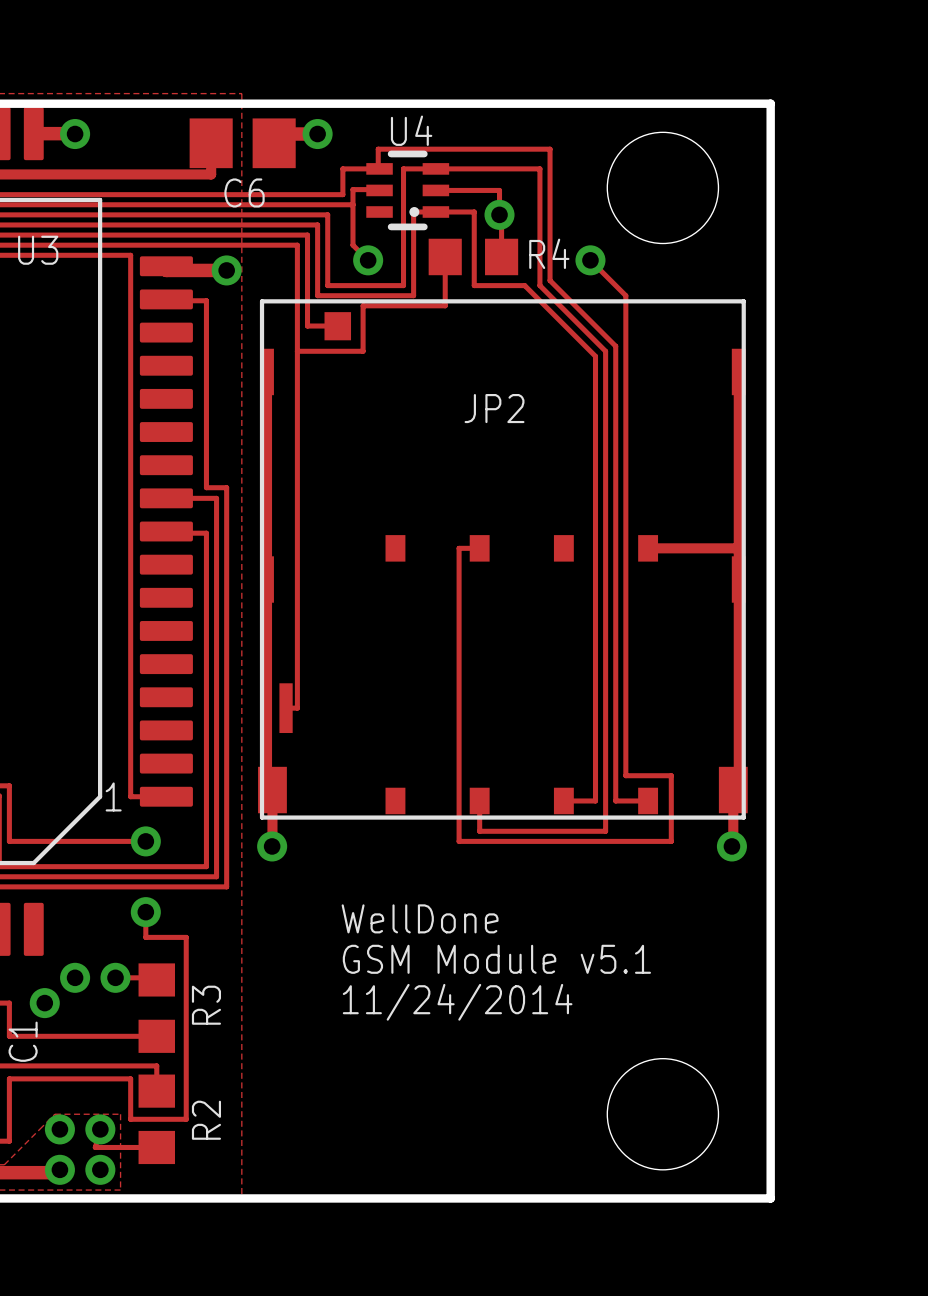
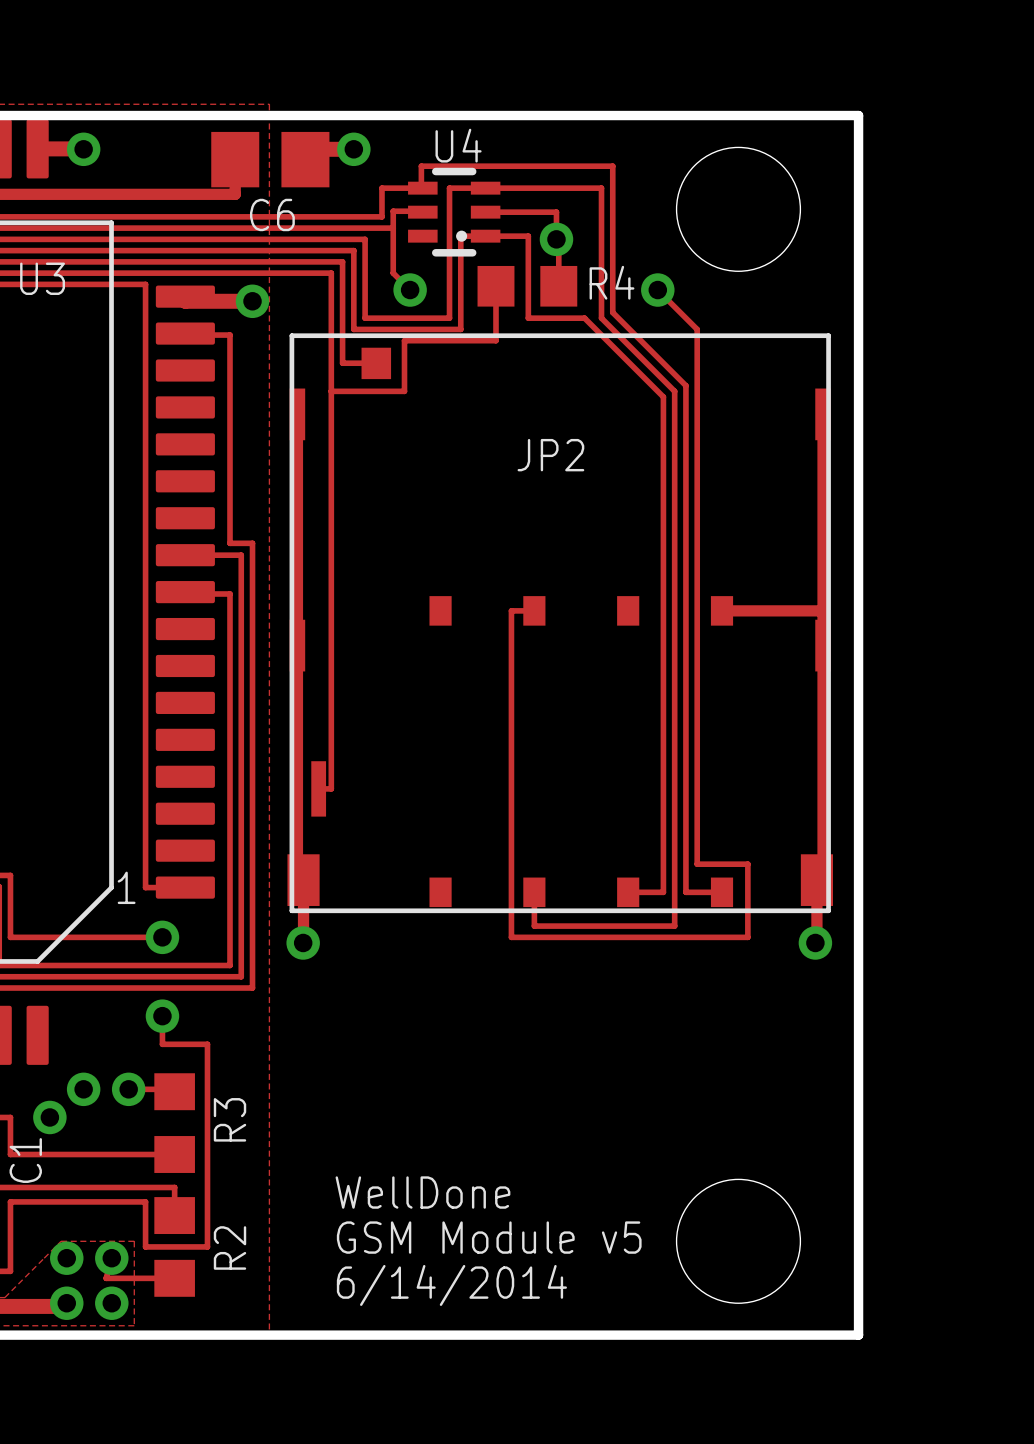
text position: WellDone (420, 918) -> WellDone (422, 1192)
text: GSM Module v5.1 (496, 959) -> none
text: 11/24/2014 (457, 1002) -> none
text: none -> GSM Module v5 (489, 1237)
text: none -> 6/14/2014 (451, 1285)

